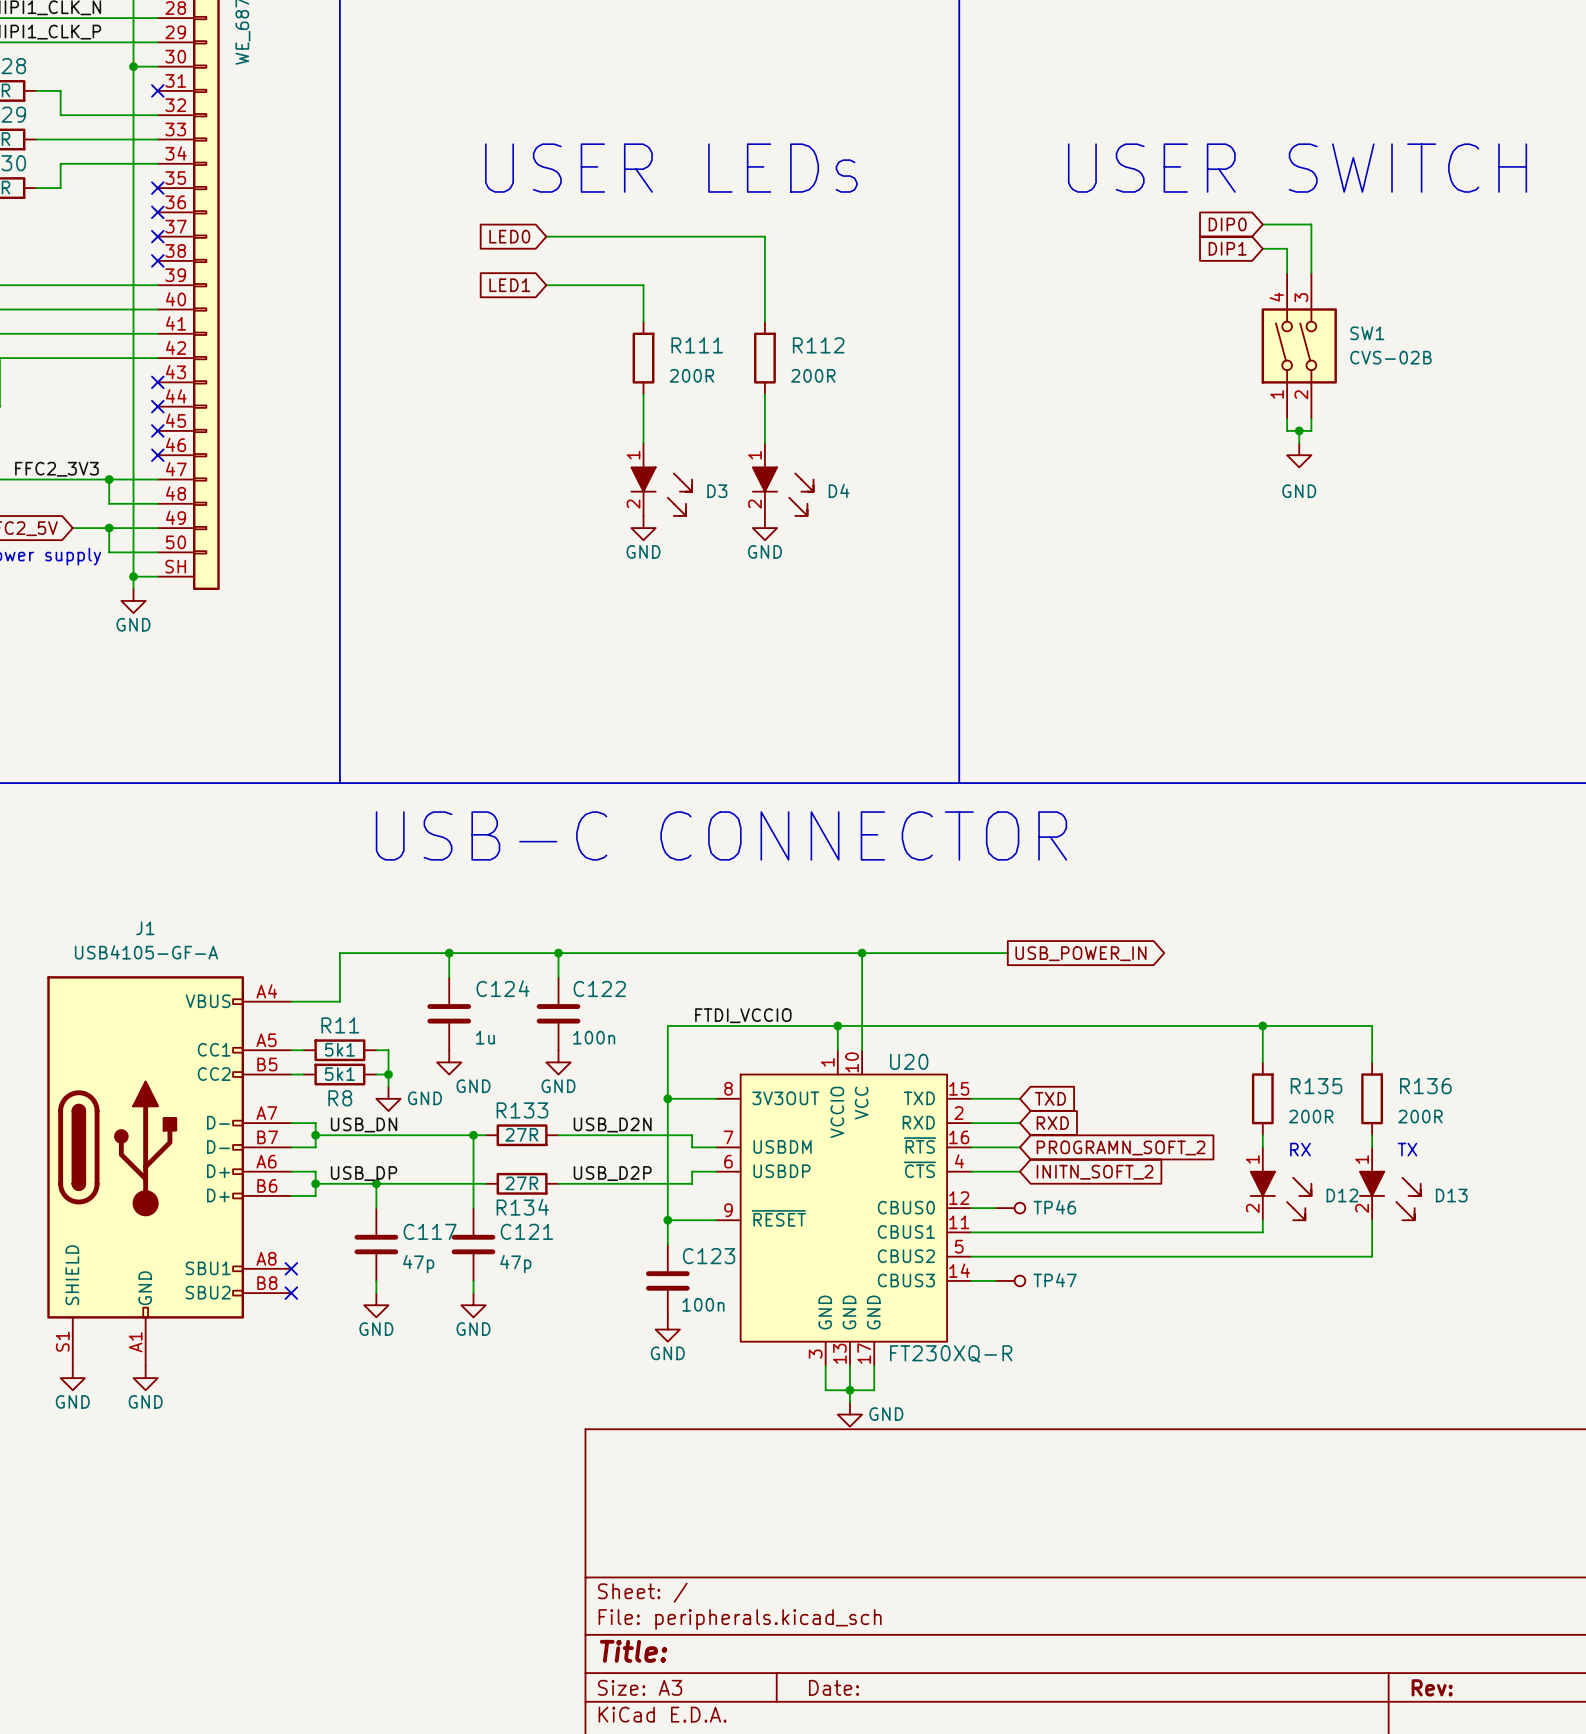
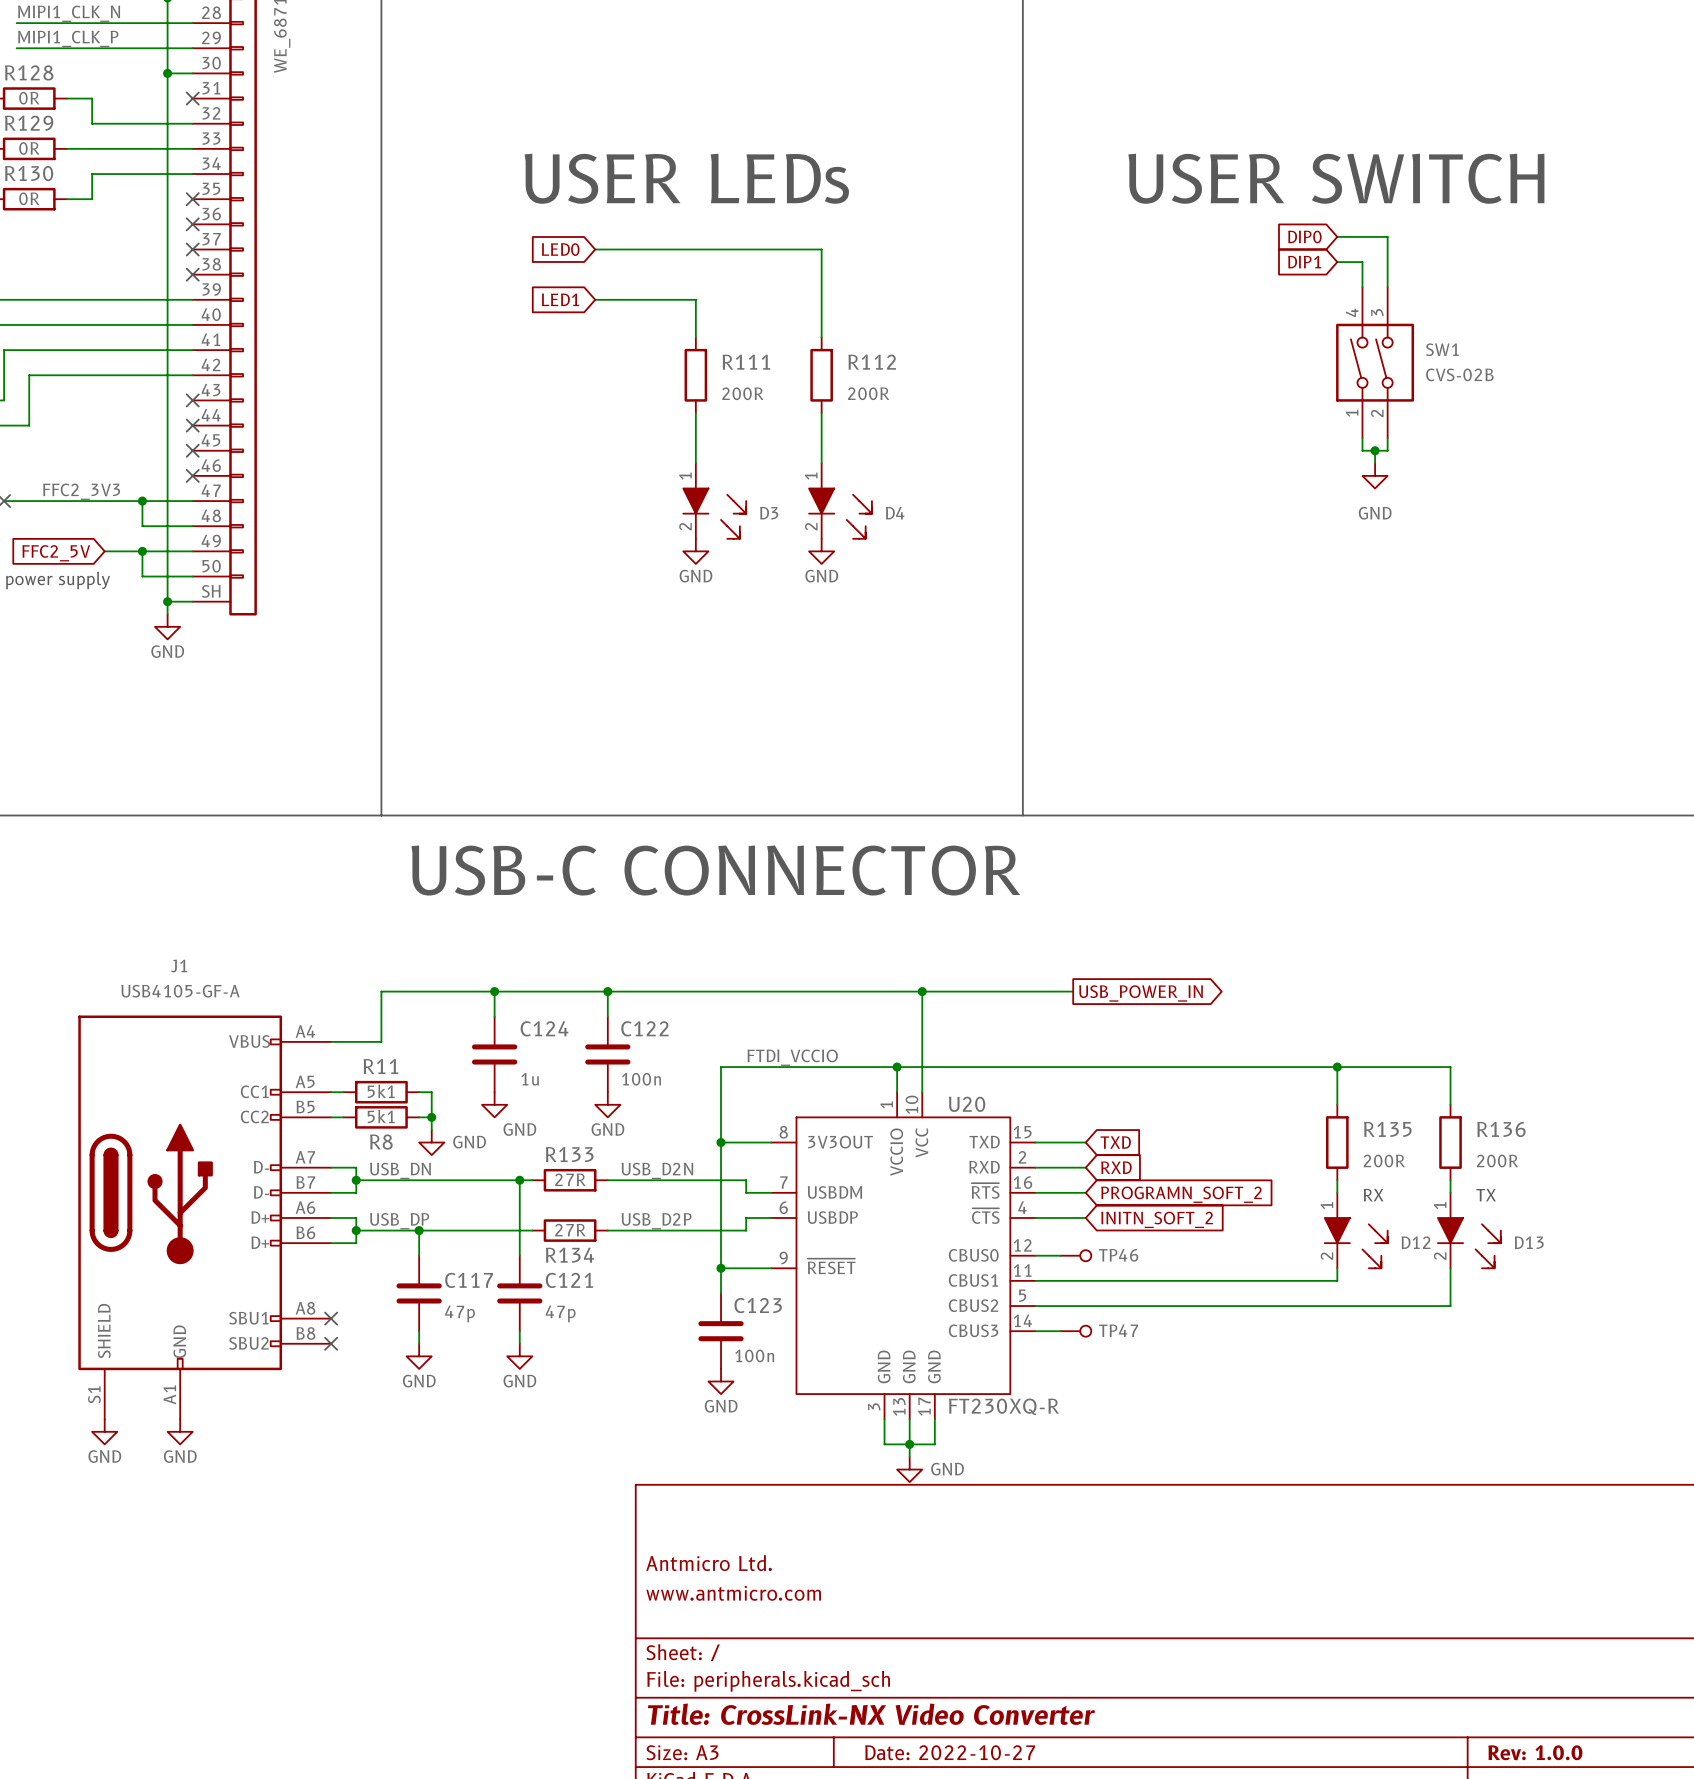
title block: none -> Antmicro Ltd. (709, 1563)
title block: none -> www.antmicro.com (733, 1593)
title block: Title: (633, 1651) -> Title: CrossLink-NX Video Converter (871, 1714)
title block: Date: (834, 1687) -> Date: 2022-10-27 (950, 1752)
title block: Rev: (1432, 1687) -> Rev: 1.0.0 (1535, 1752)

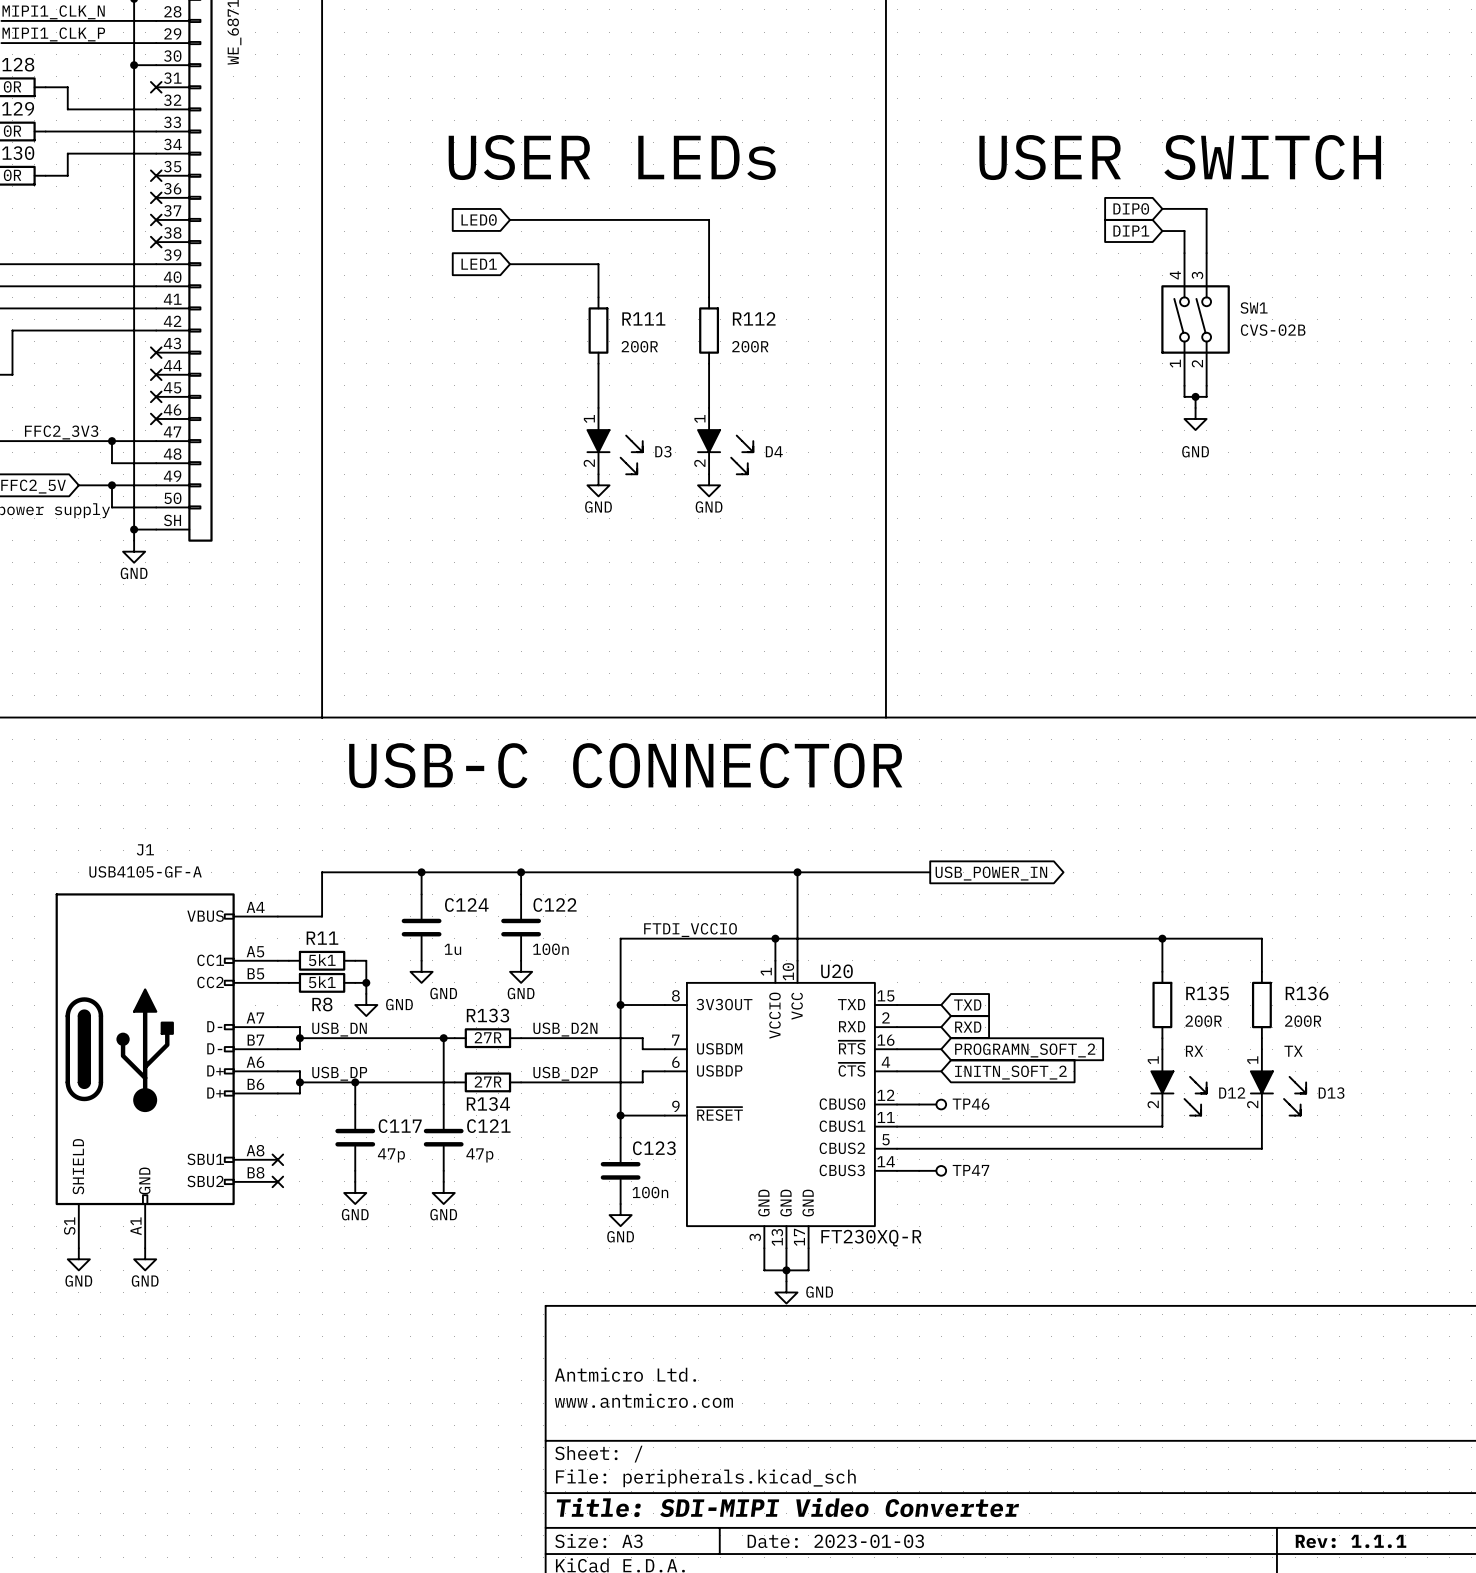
title block: Title: CrossLink-NX Video Converter (871, 1714) -> Title: SDI-MIPI Video Converter (787, 1507)
title block: Date: 2022-10-27 (950, 1752) -> Date: 2023-01-03 (835, 1541)
title block: Rev: 1.0.0 (1535, 1752) -> Rev: 1.1.1 (1351, 1541)

